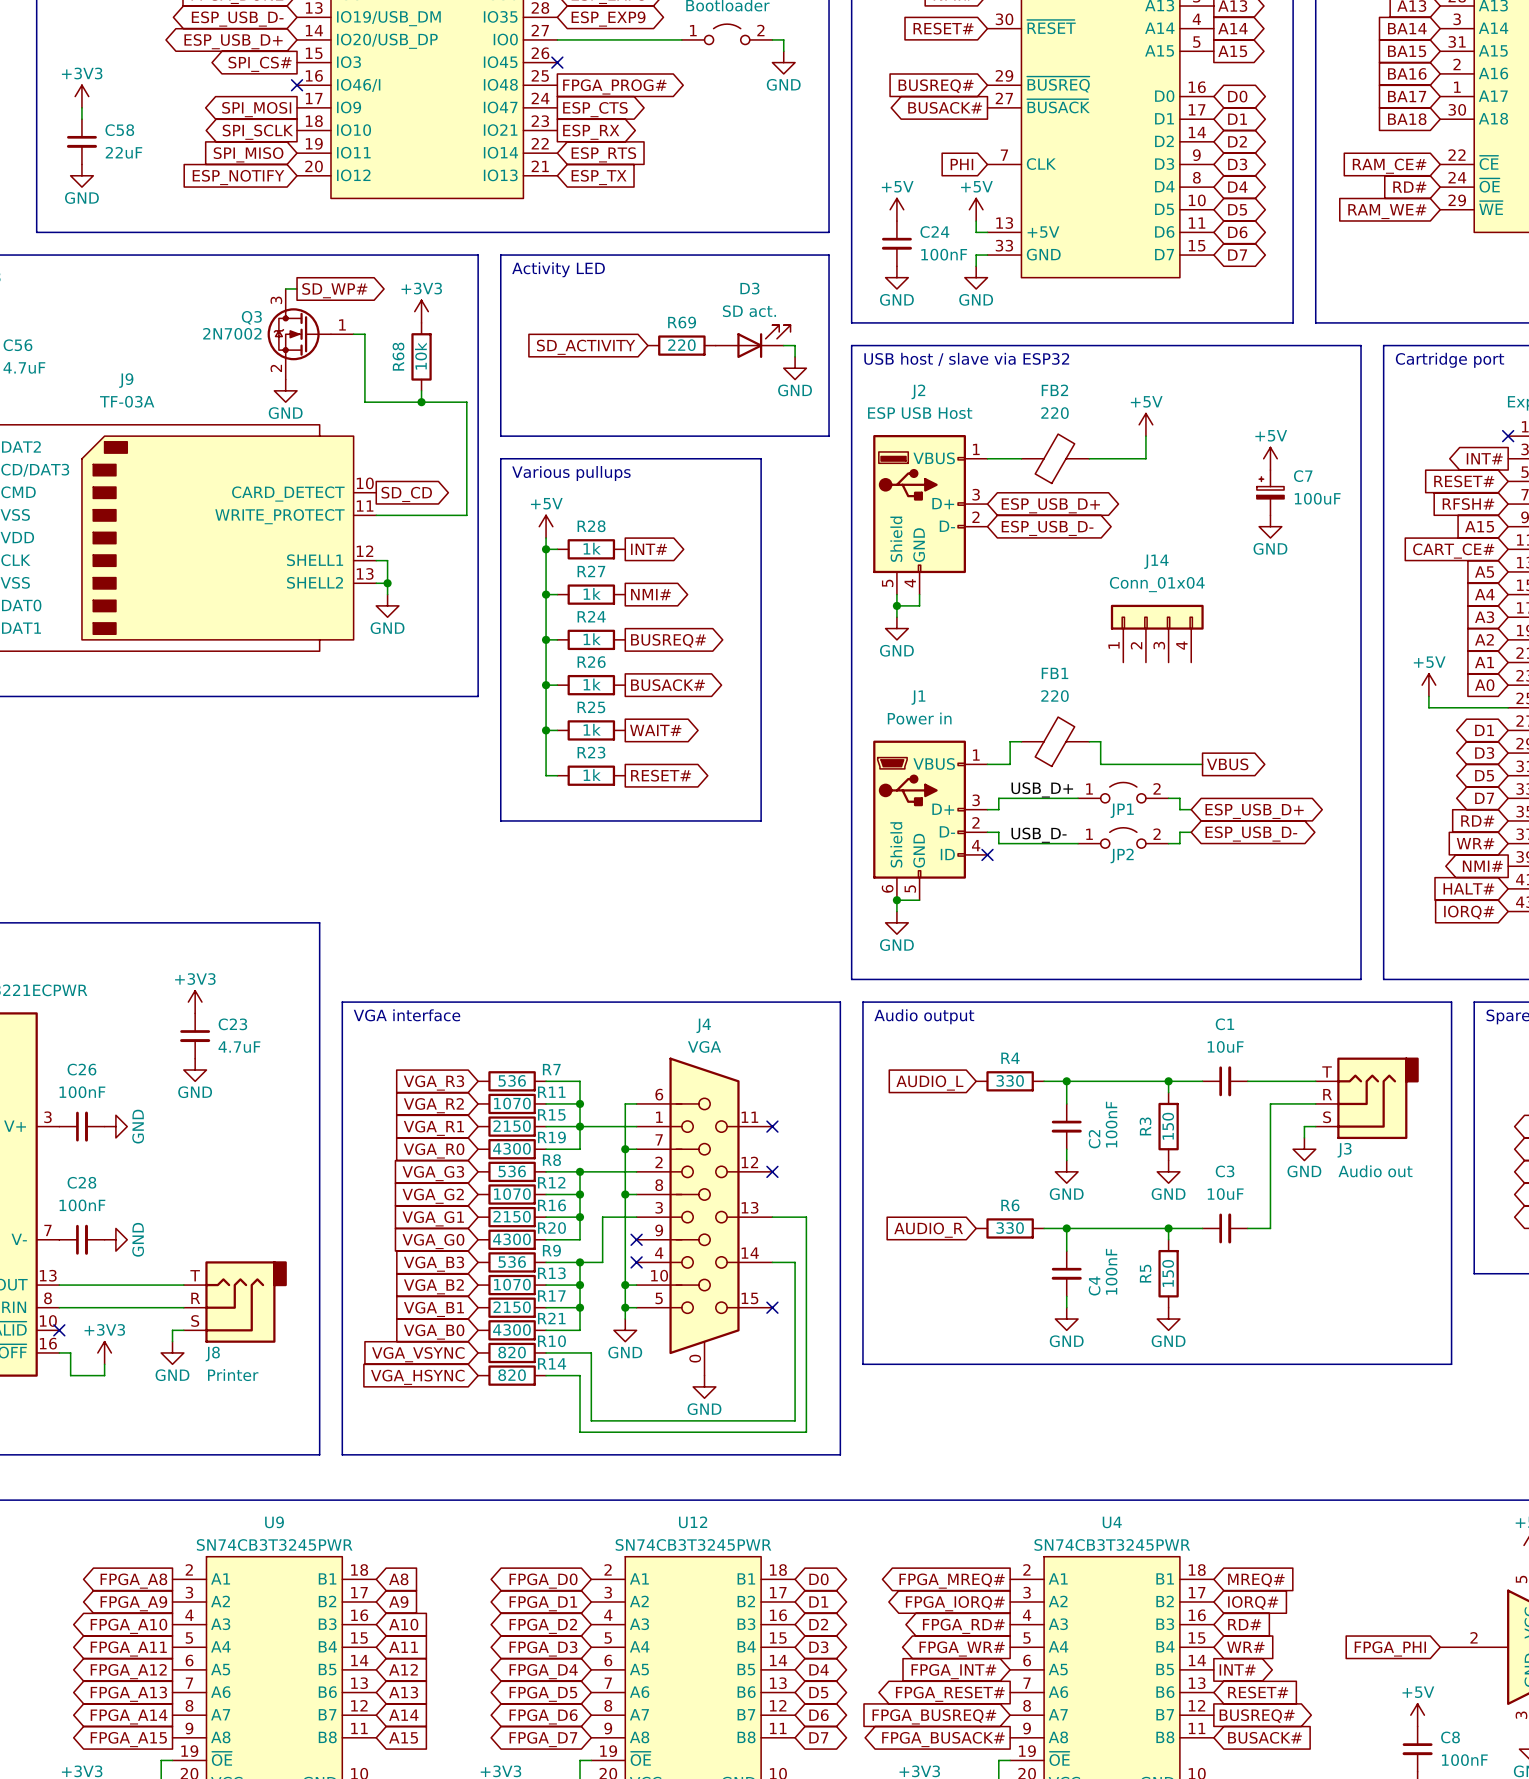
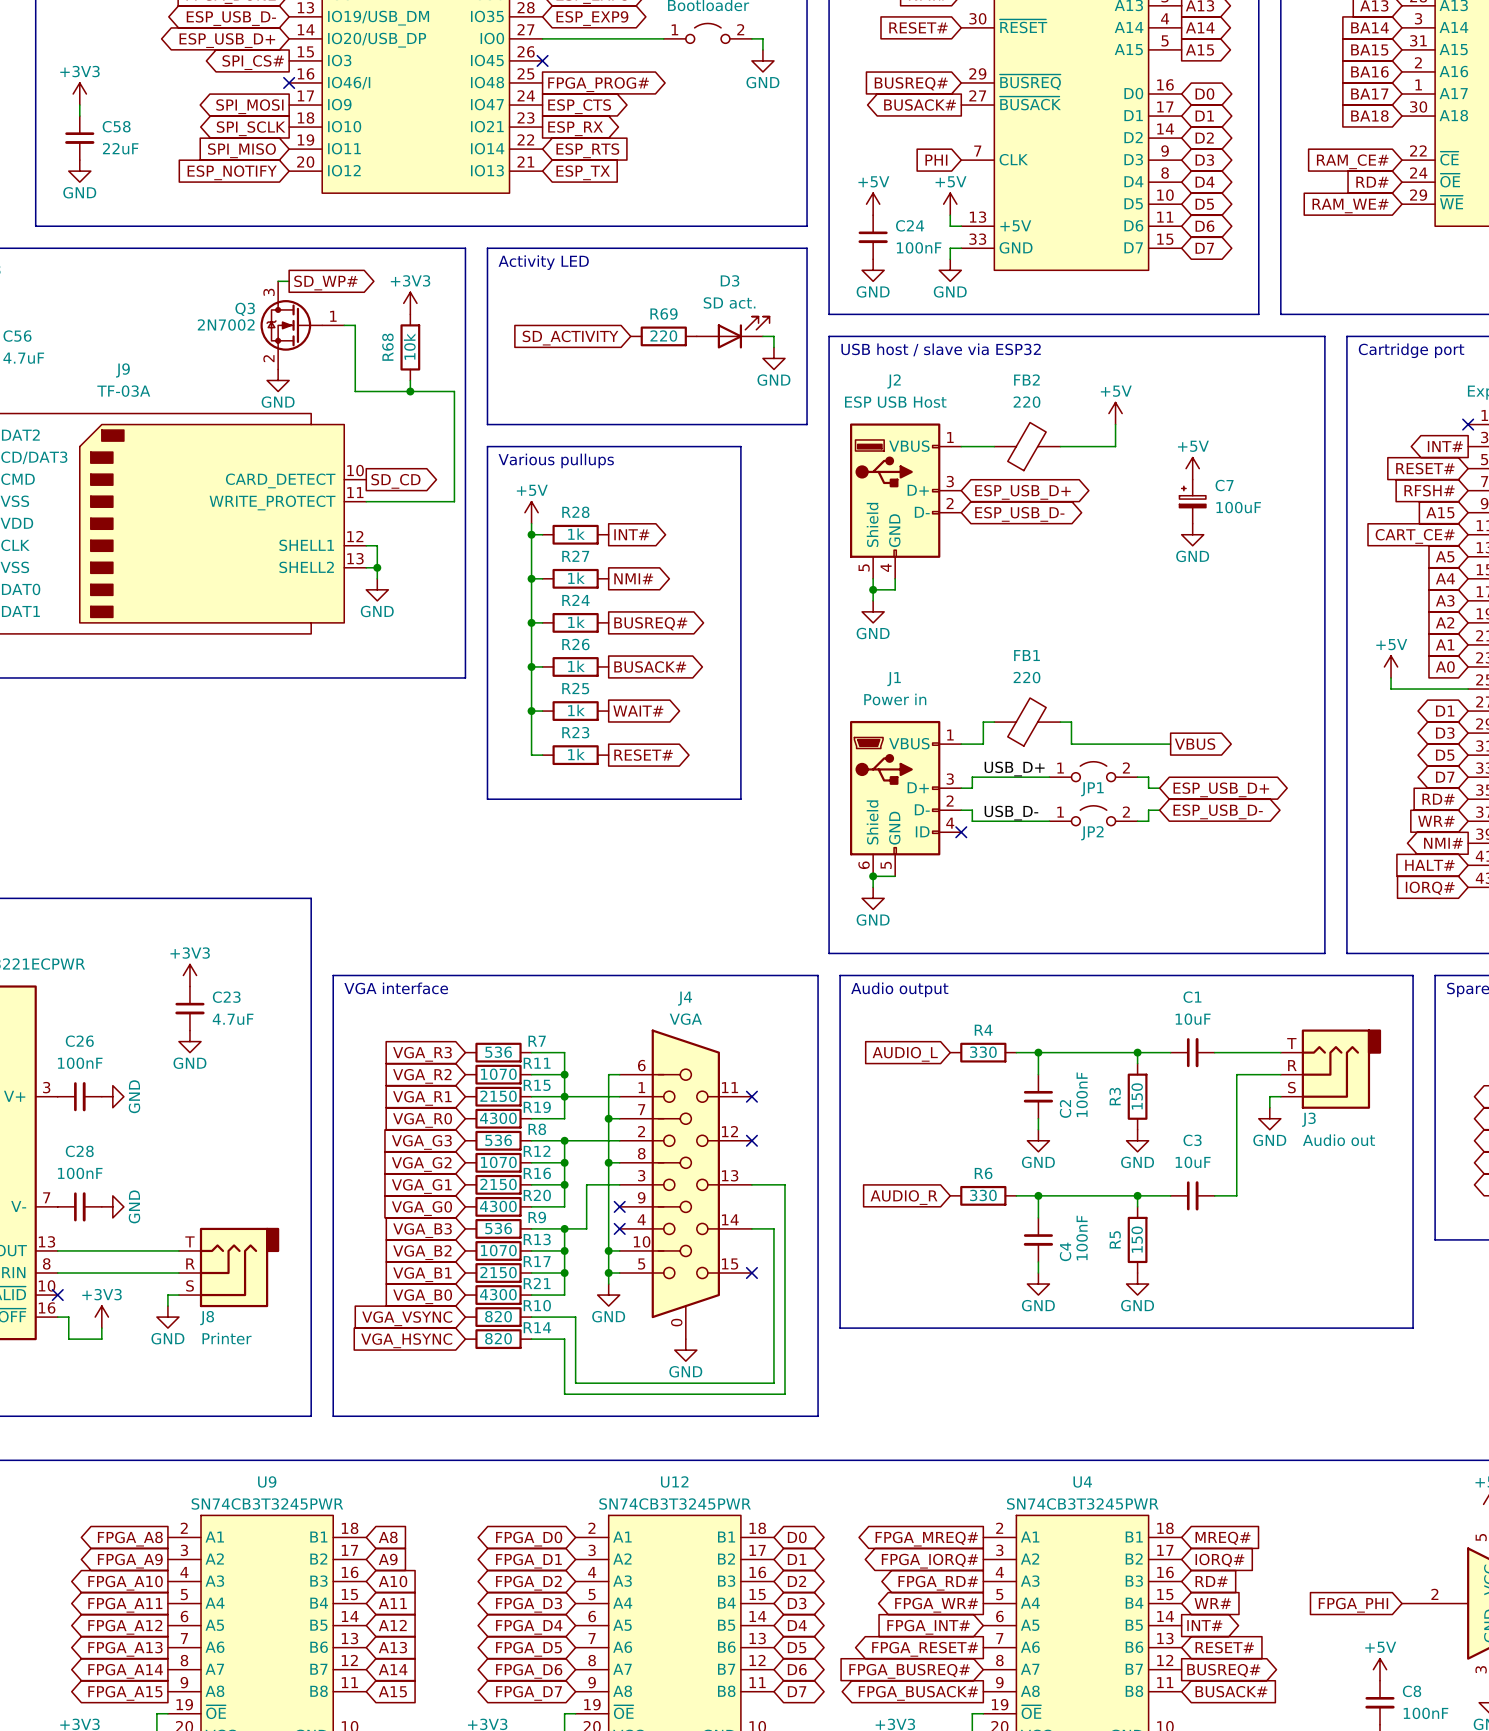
power symbol position: +5V (1270, 458) -> +5V (1192, 468)
C7 position: (1270, 492) -> (1192, 501)
power symbol position: GND (1270, 526) -> GND (1192, 534)
J14: Conn_01x04 (1157, 633) -> none

